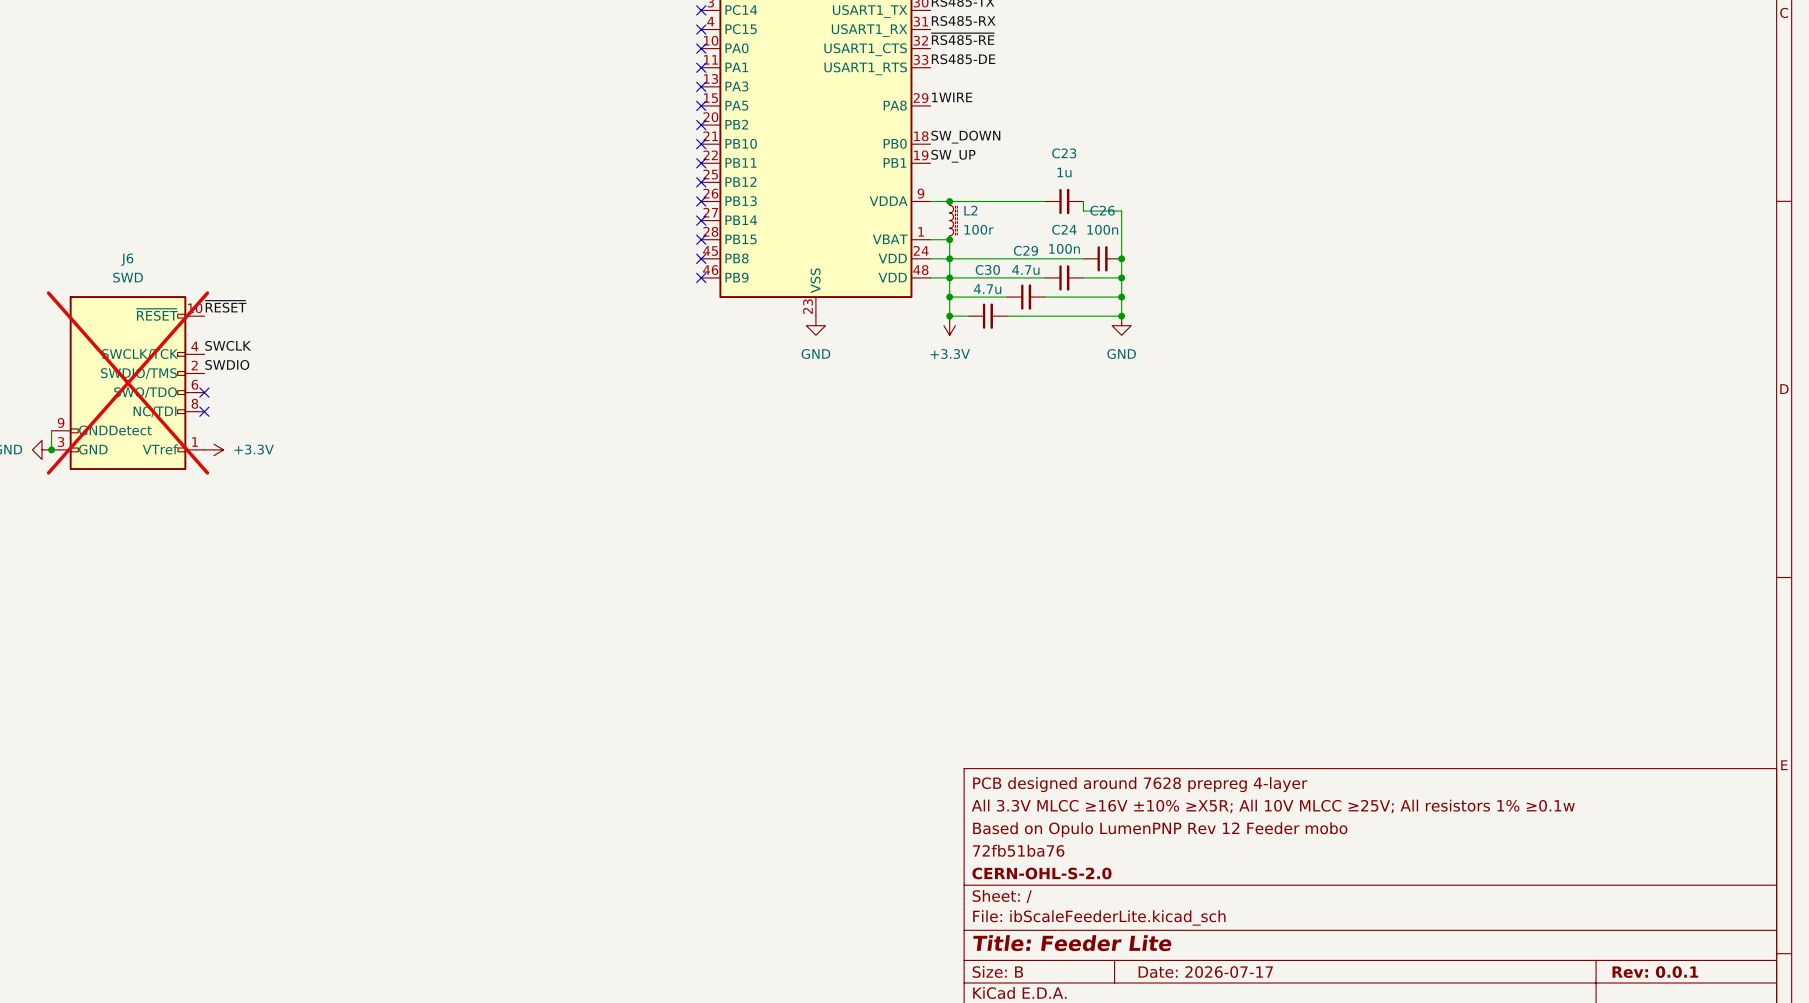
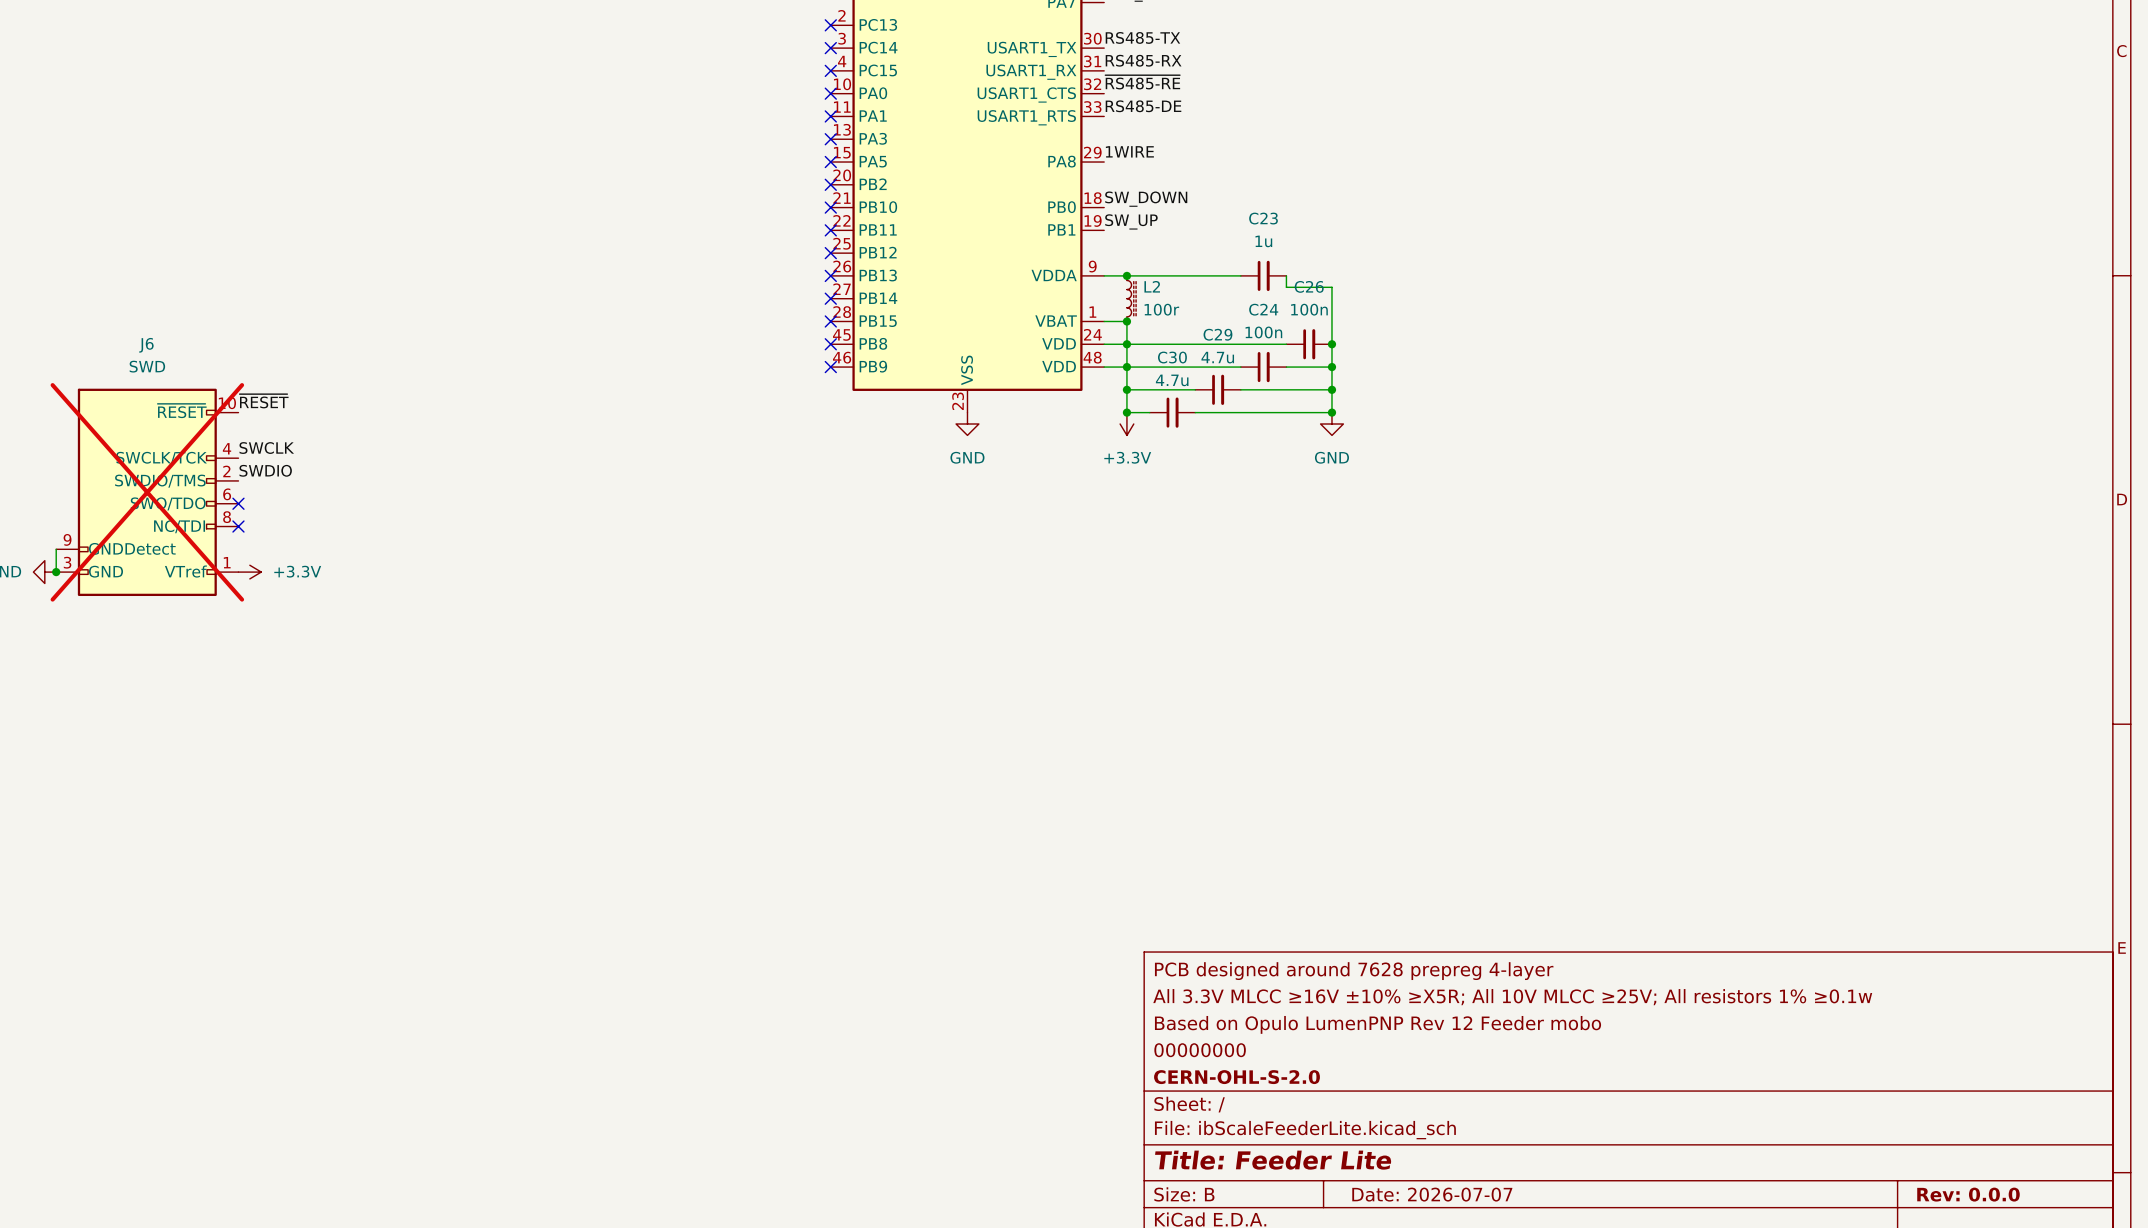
title block: 72fb51ba76 (1018, 850) -> 00000000 (1200, 1050)
title block: Date: 2026-07-17 (1205, 972) -> Date: 2026-07-07 (1432, 1194)
title block: Rev: 0.0.1 (1655, 972) -> Rev: 0.0.0 (1968, 1194)

